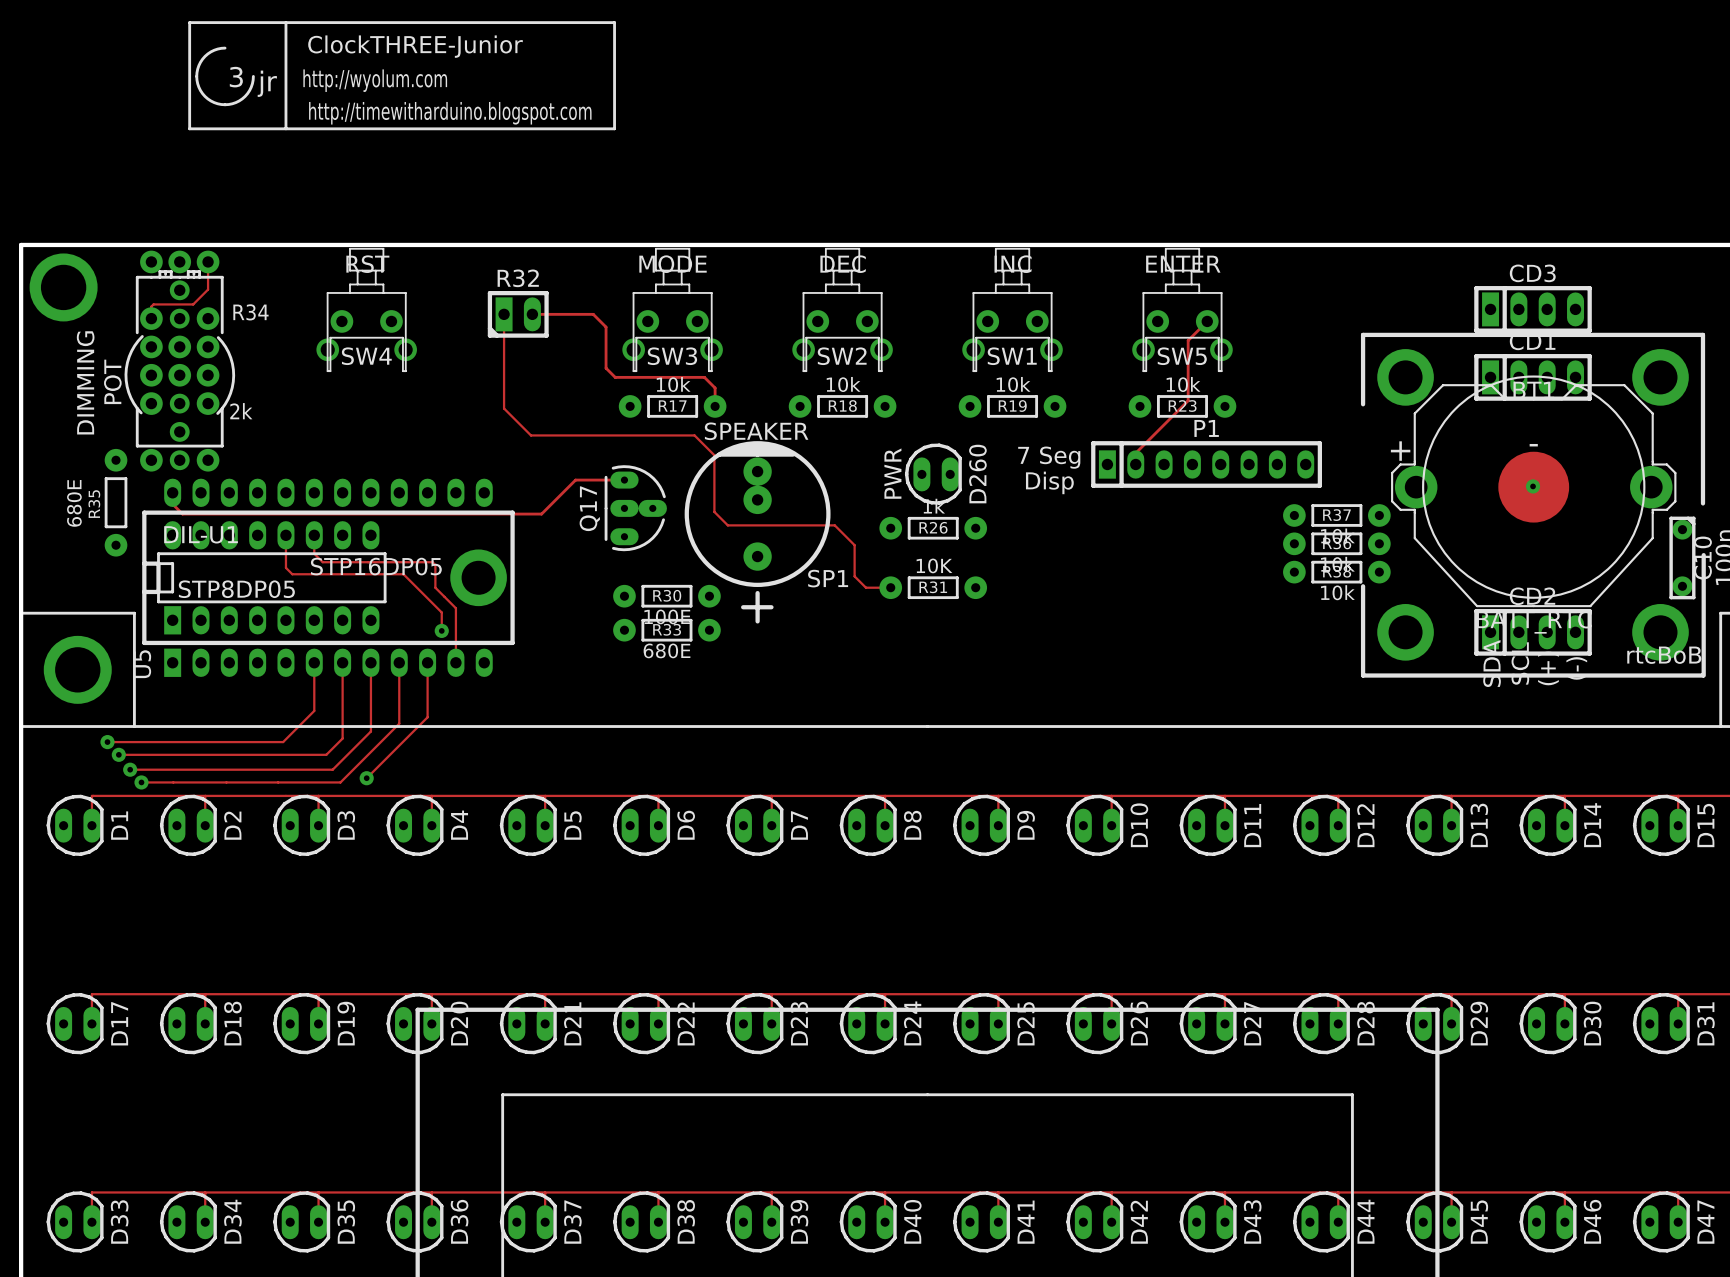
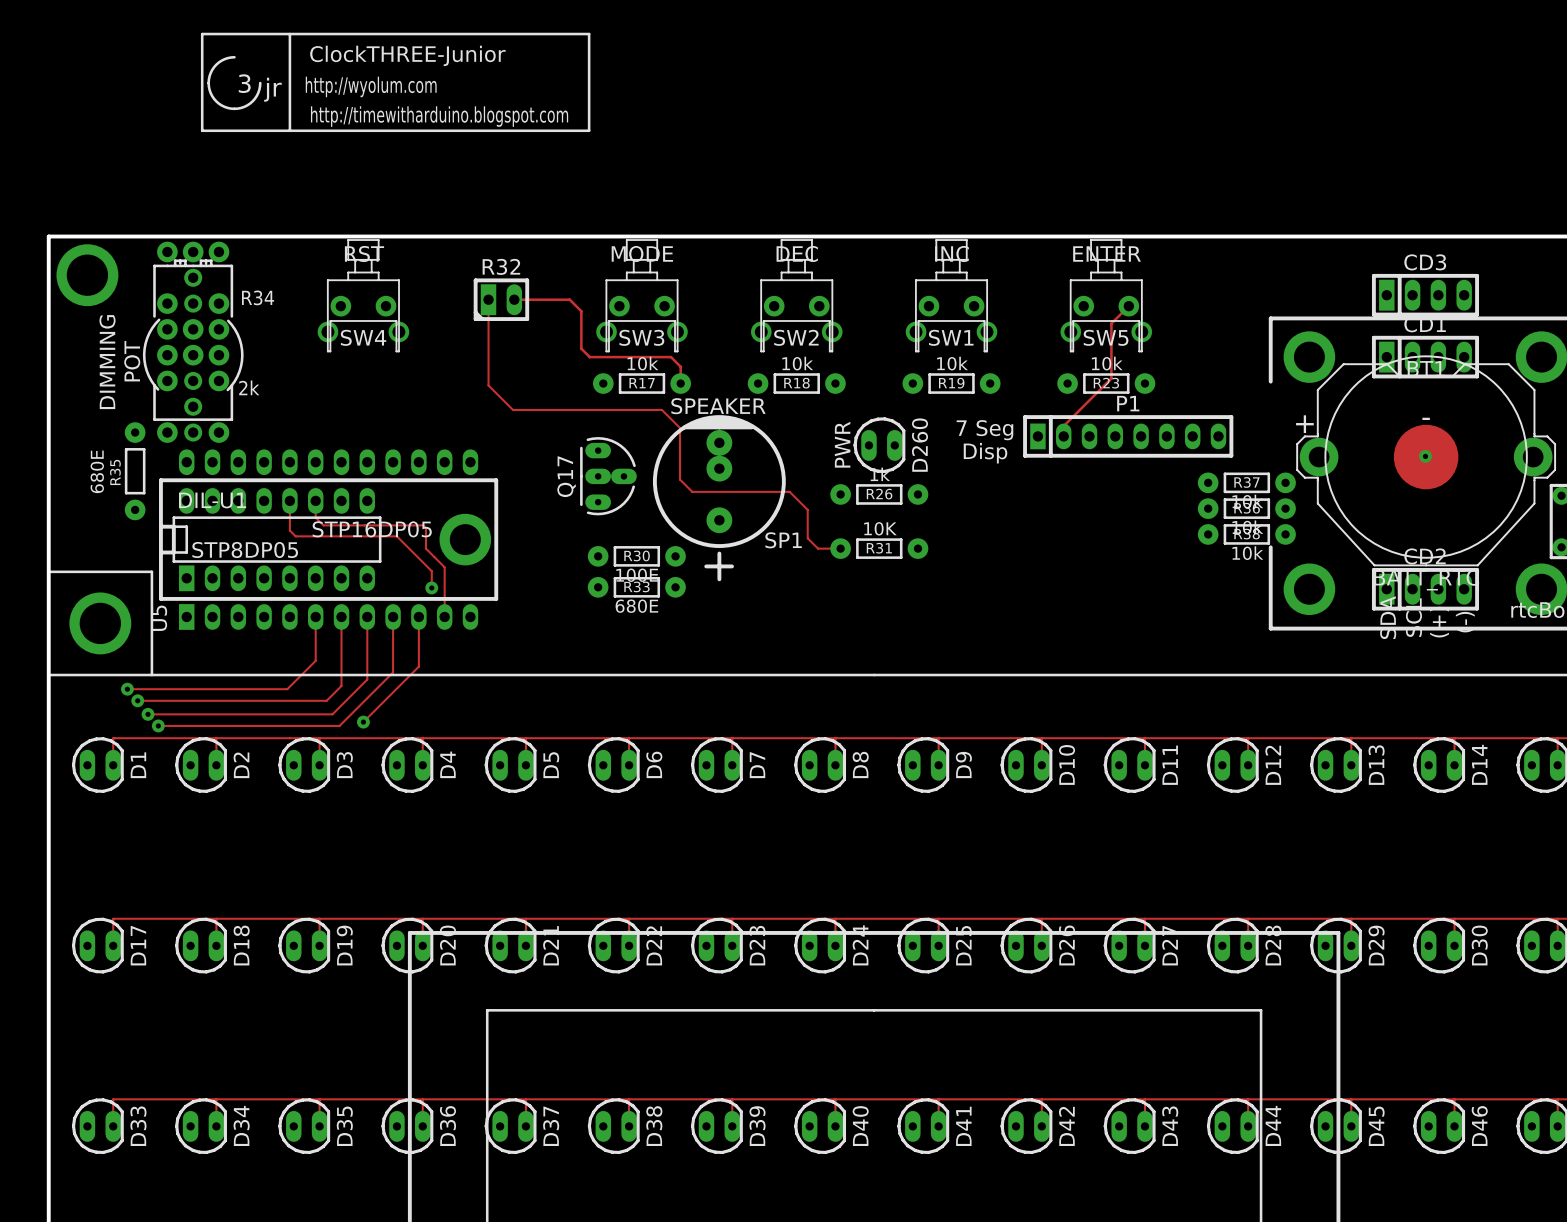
track: (208, 261) (208, 289) (193, 304) (153, 304) (151, 306) (151, 318) -> none
track: (624, 480) (575, 480) (541, 514) (182, 514) (172, 504) (172, 492) -> none

